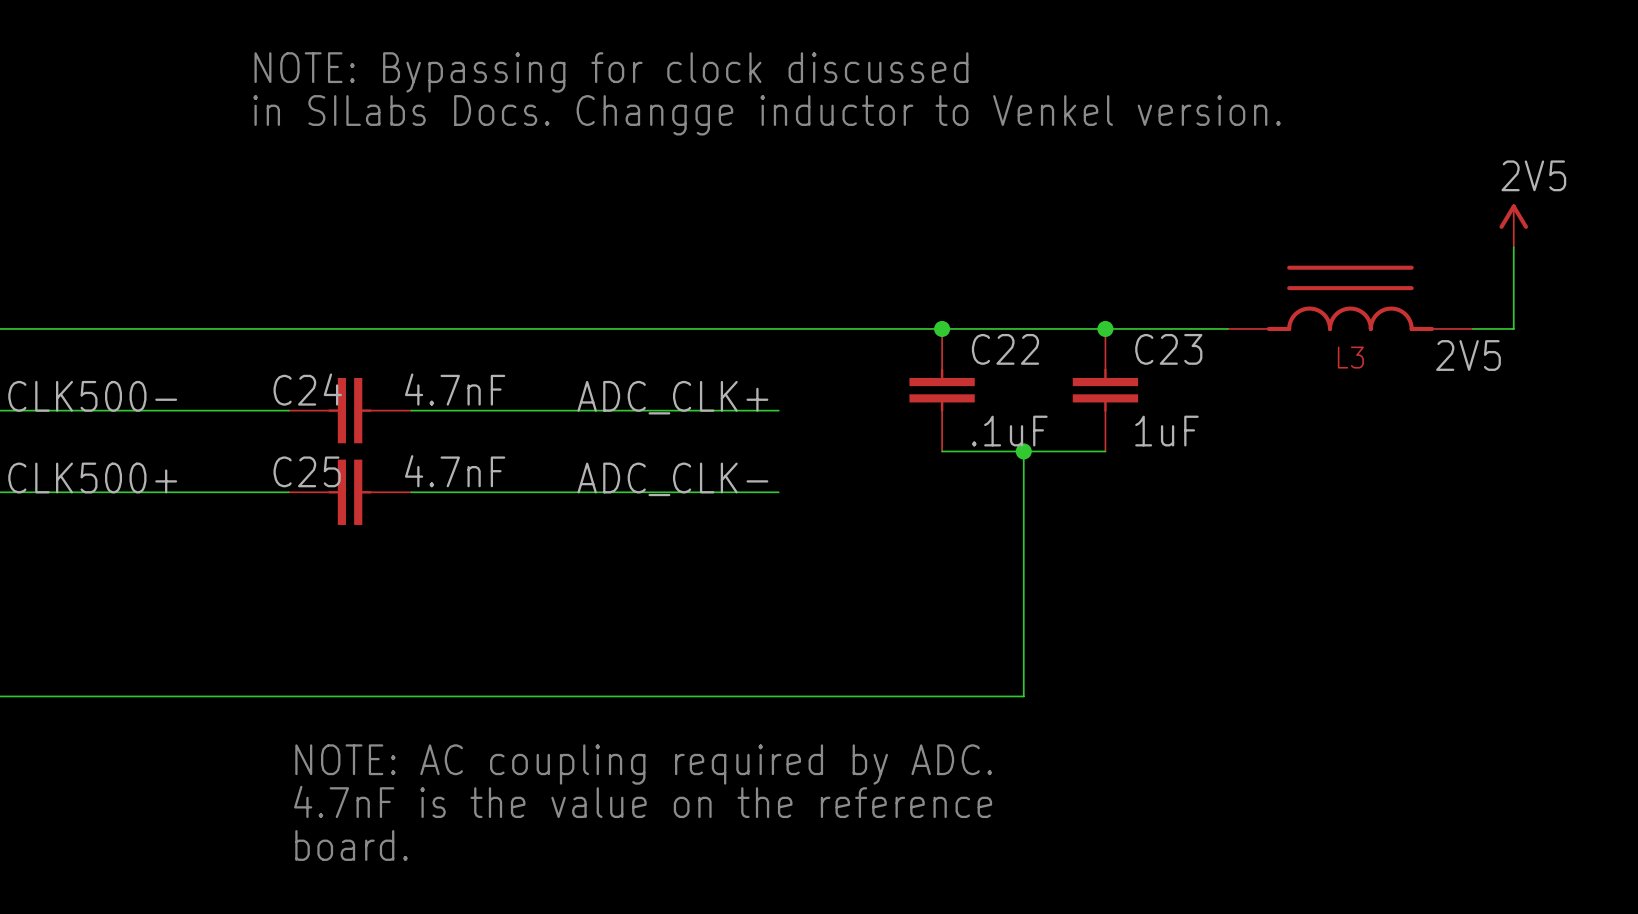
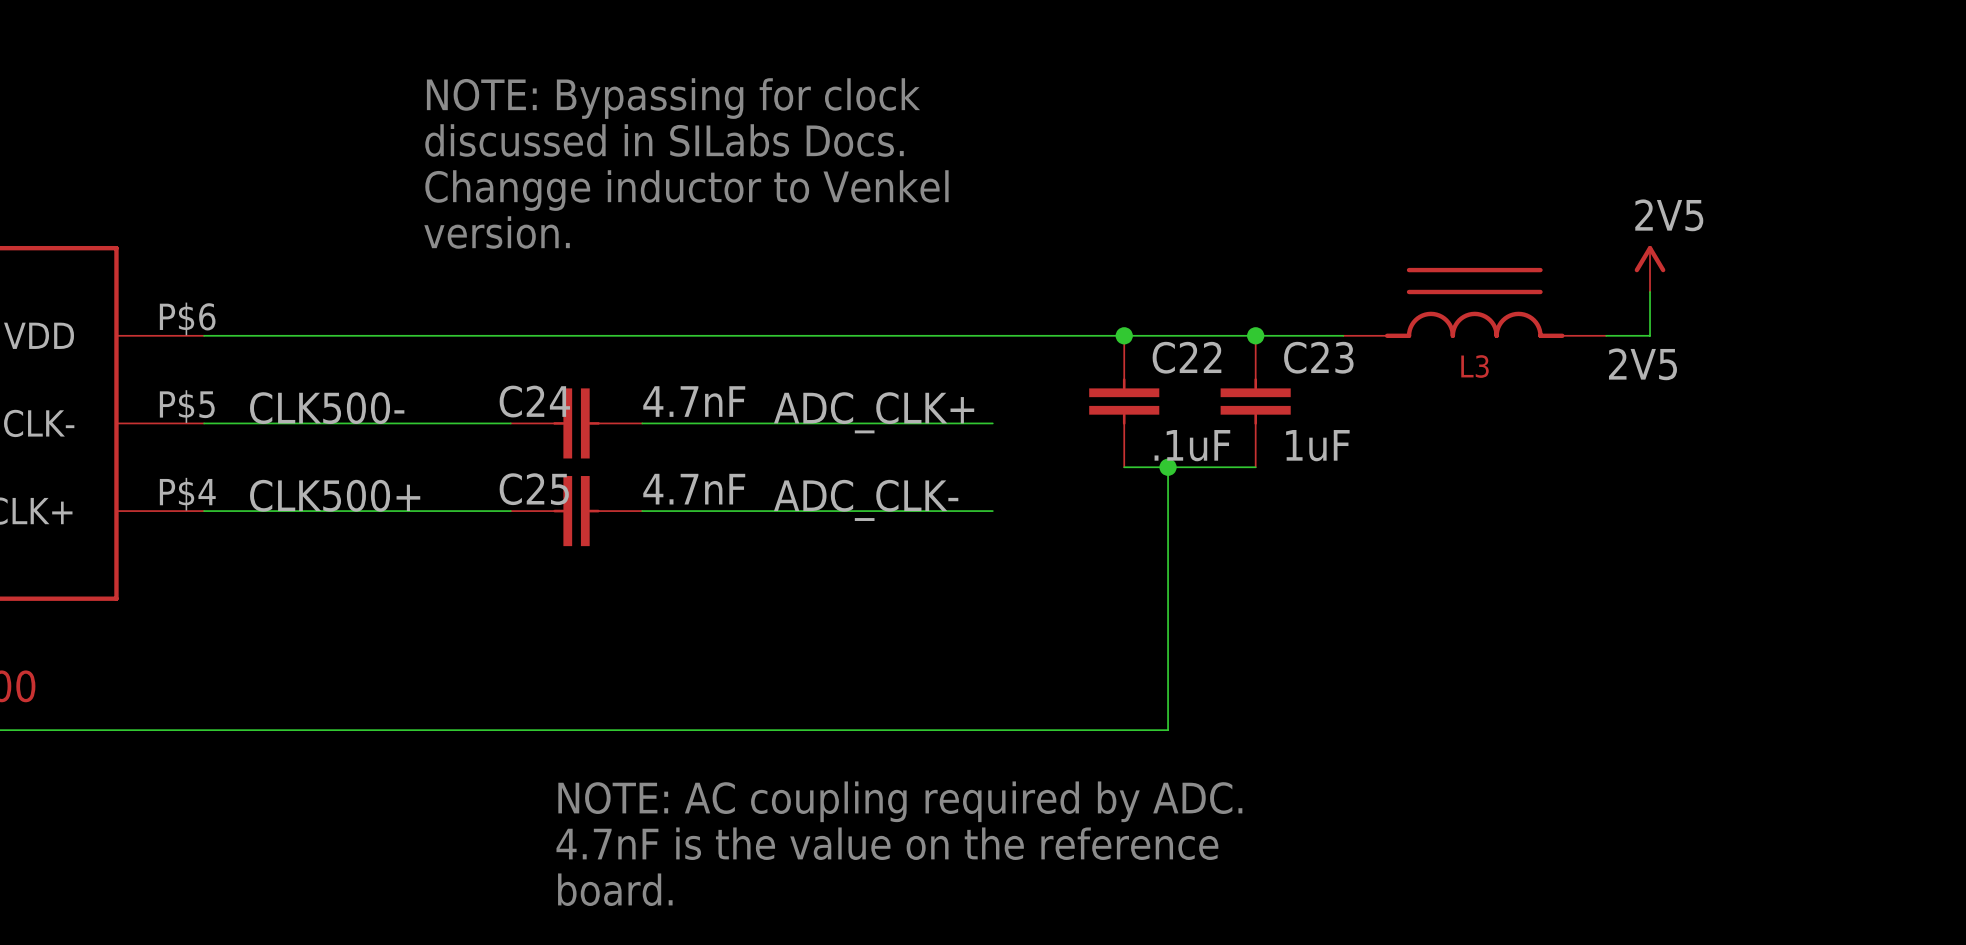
text: NOTE: Bypassing for clock discussed (611, 72) -> NOTE: Bypassing for clock (673, 98)
text: in SILabs Docs. Changge inductor to Venkel version. (767, 115) -> none
text: none -> discussed in SILabs Docs. (664, 140)
text: none -> Changge inductor to Venkel (686, 190)
power symbol position: 2V5 (1513, 225) -> 2V5 (1650, 268)
text: none -> version. (497, 232)
wire: (1513, 247) (1513, 328) (1472, 328) -> none
wire: none -> (1650, 291) (1650, 335) (1606, 335)
L3 position: (1350, 298) -> (1474, 302)
junction: none -> (1124, 335)
wire: (1023, 328) (1227, 328) -> none
junction: (1105, 328) -> none
C22 name: C22 (1005, 349) -> C23 (1318, 357)
label position: 2V5 (1468, 355) -> 2V5 (1642, 364)
C22: none -> .1uF (1124, 401)
C23: 1uF (1105, 390) -> none
label position: ADC_CLK+ (672, 397) -> ADC_CLK+ (874, 412)
C24 position: (350, 410) -> (576, 423)
wire: (697, 410) (778, 410) -> none
C22 value: .1uF (1009, 431) -> 1uF (1317, 445)
junction: none -> (1168, 467)
wire: (942, 451) (1105, 451) -> (1255, 467) (1124, 467)
wire: (1023, 451) (1023, 696) (860, 696) -> (1168, 467) (1168, 730)
junction: (1023, 451) -> none
label position: ADC_CLK- (672, 479) -> ADC_CLK- (866, 500)
C25 position: (350, 492) -> (576, 511)
wire: (697, 492) (778, 492) -> none

